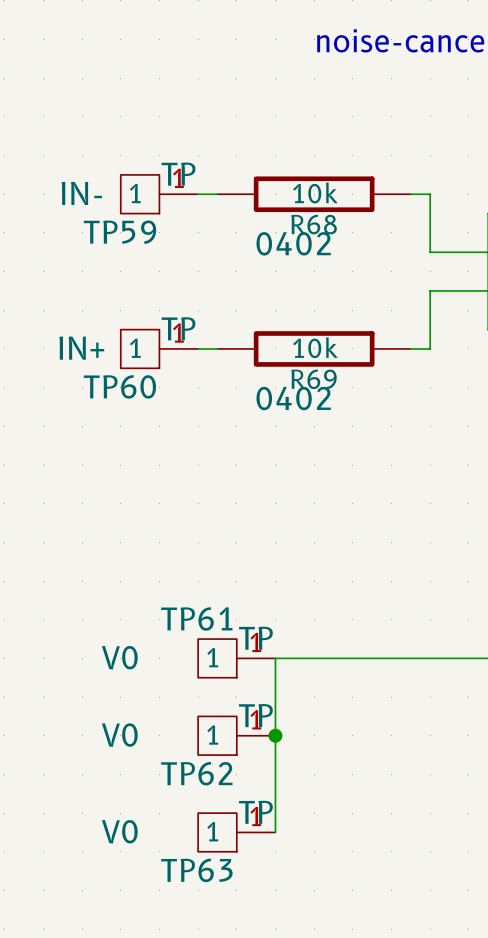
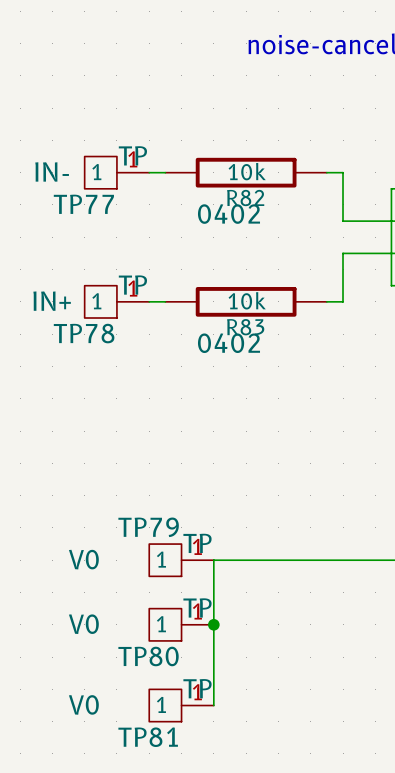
R68 name: R68 (314, 224) -> R82 (245, 198)
TP59 name: TP59 (120, 232) -> TP77 (83, 204)
R69 name: R69 (314, 379) -> R83 (245, 327)
TP60 name: TP60 (119, 386) -> TP78 (84, 333)
TP61 name: TP61 (196, 618) -> TP79 (148, 527)
TP62 name: TP62 (196, 773) -> TP80 (148, 656)
TP63 name: TP63 (196, 870) -> TP81 (148, 737)

